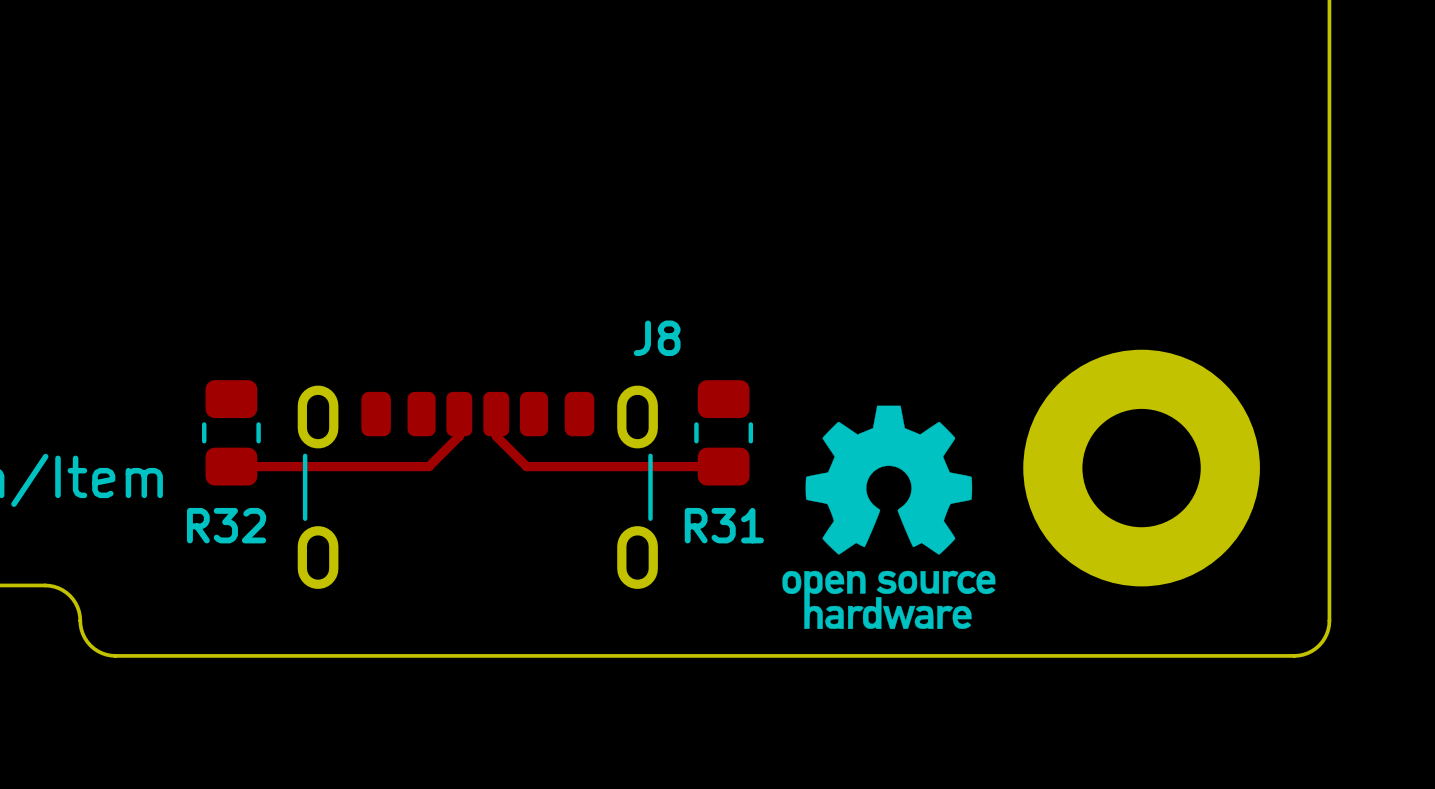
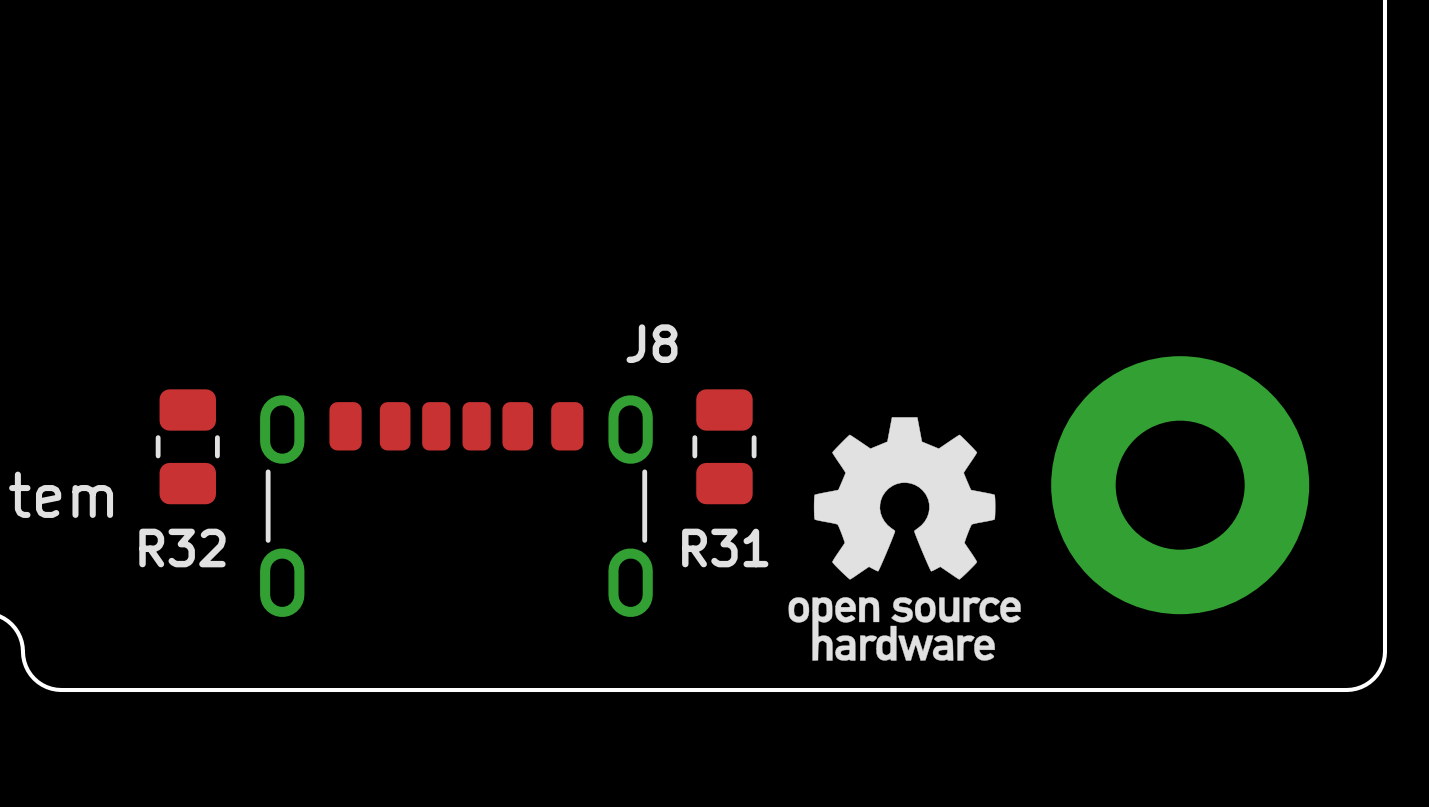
track: (459, 414) (459, 436) (428, 466) (231, 466) -> none
track: (496, 414) (496, 436) (526, 466) (723, 466) -> none

